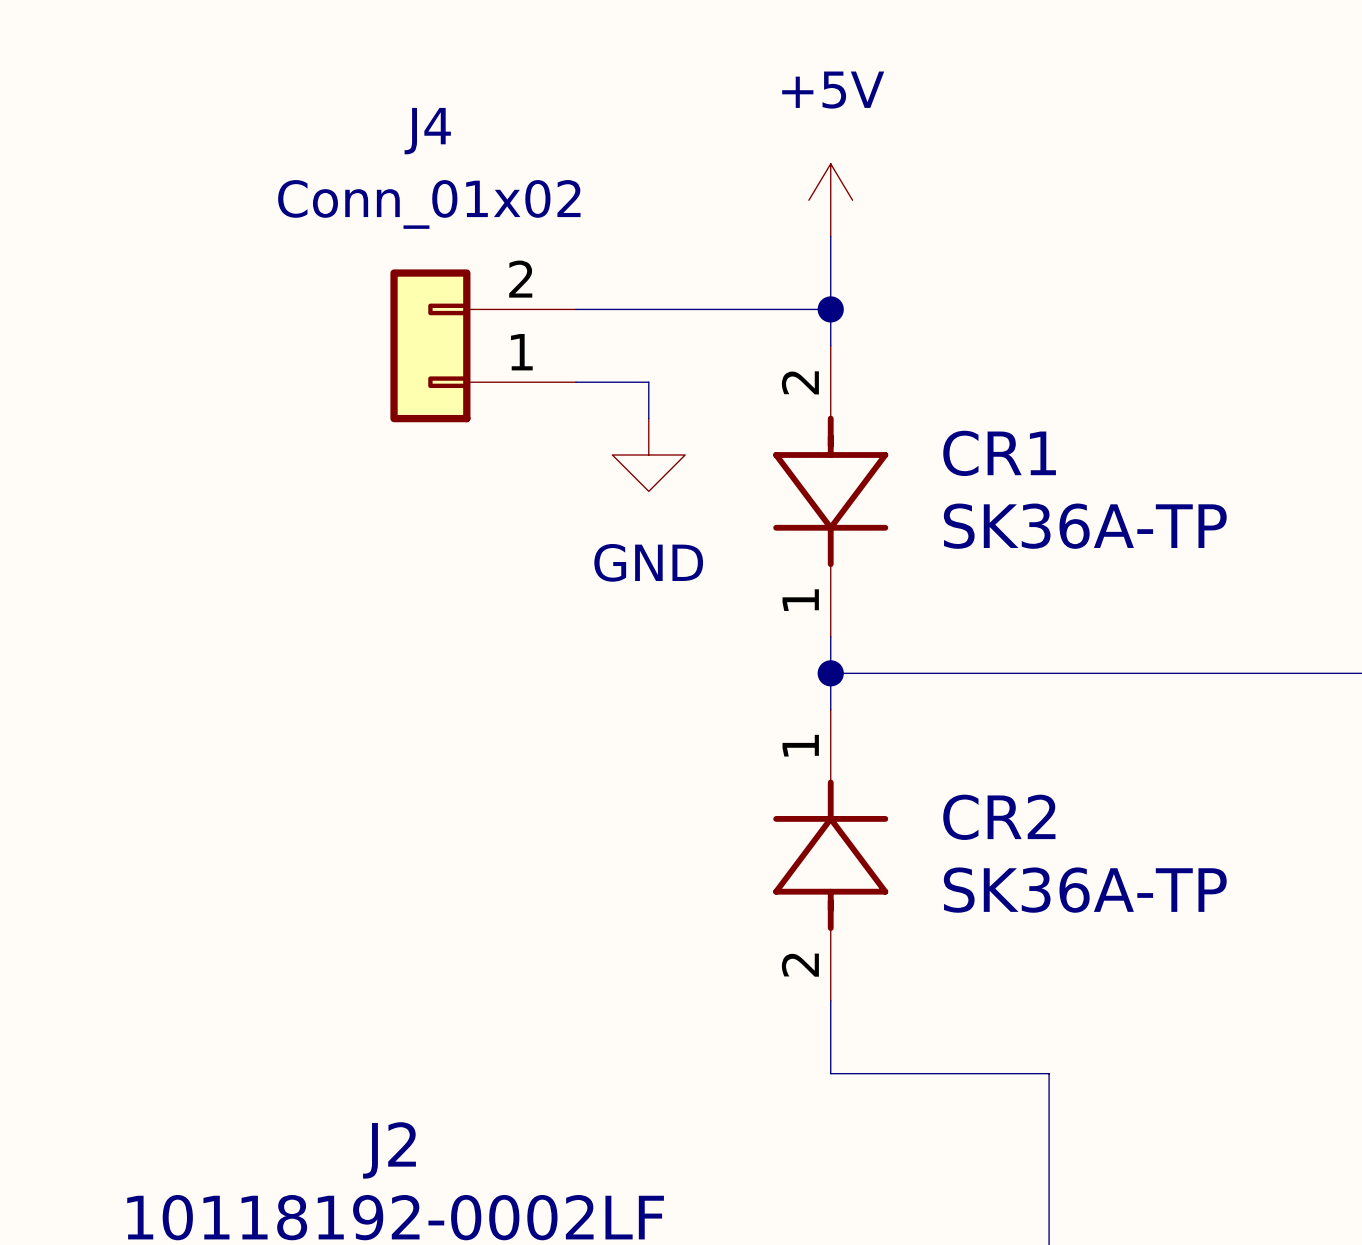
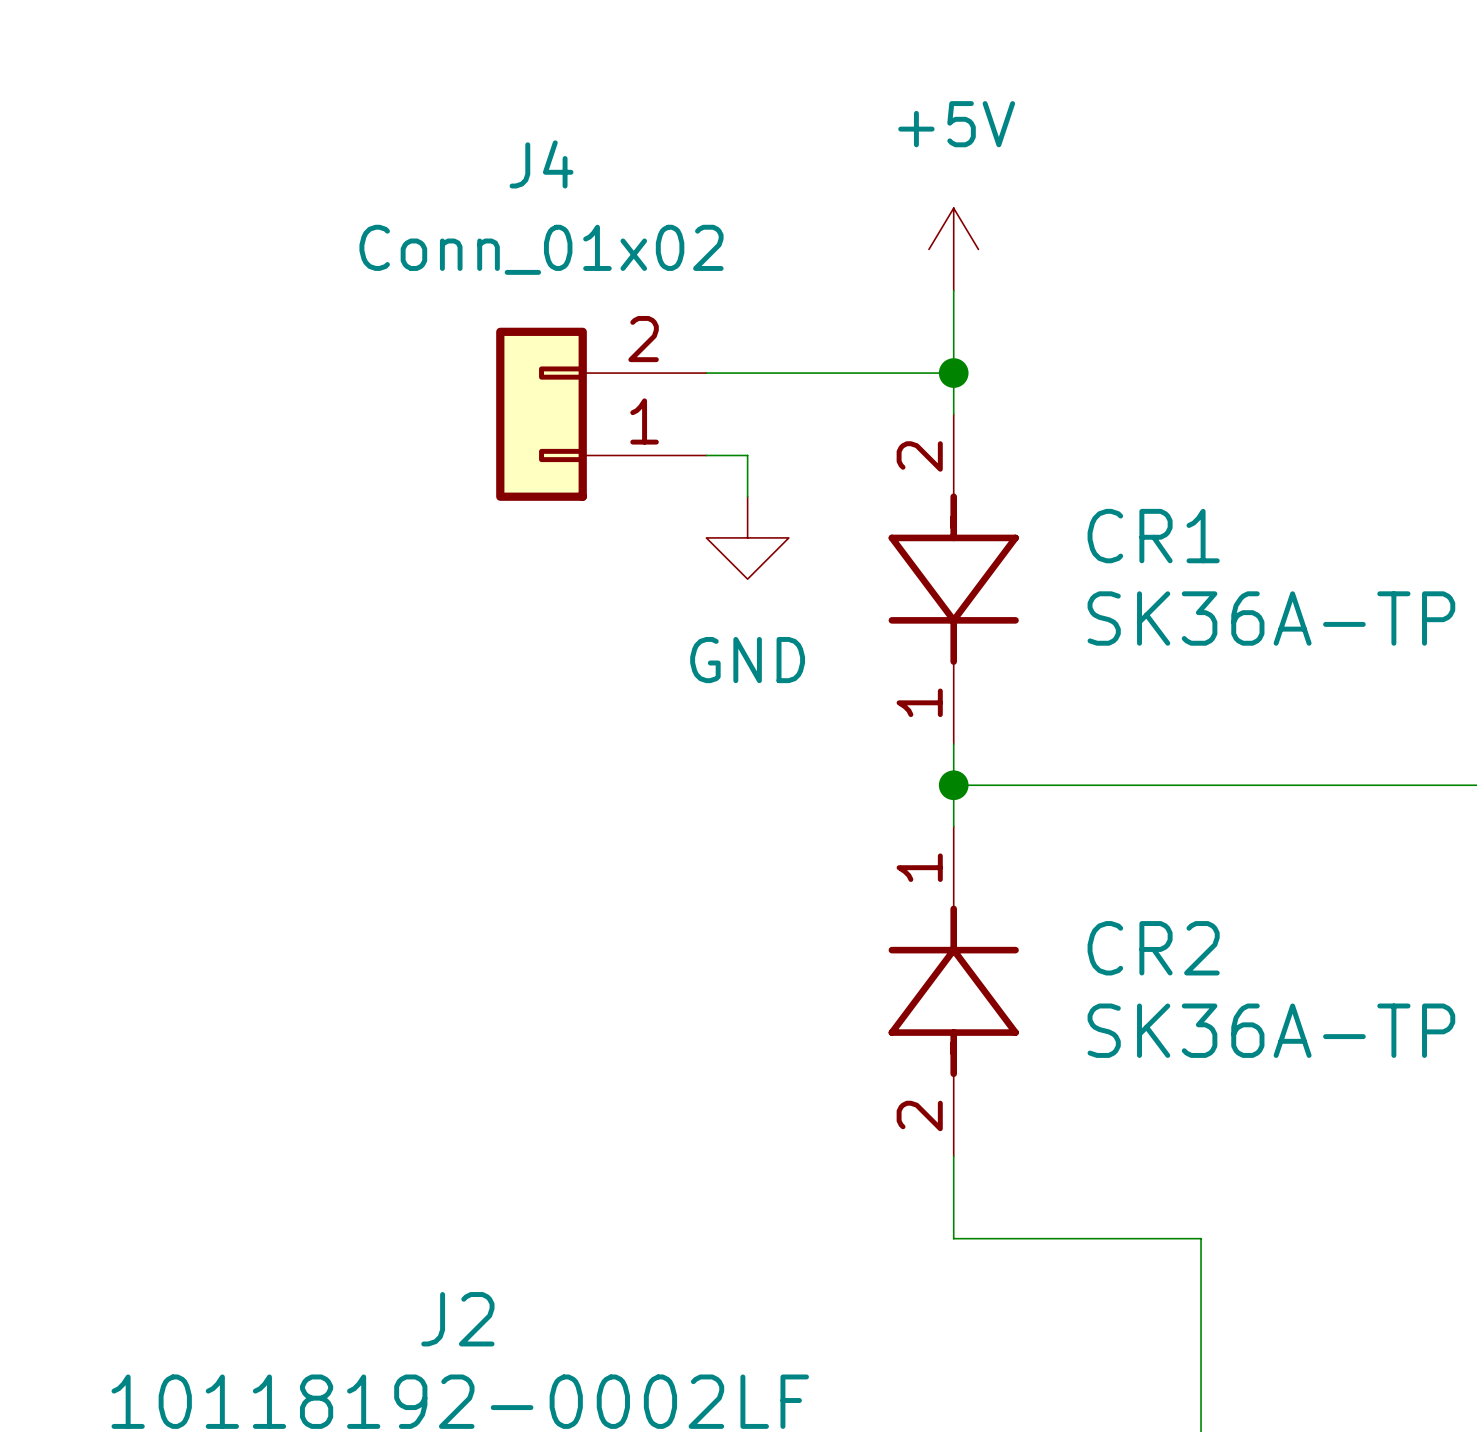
J4 position: (483, 345) -> (601, 414)

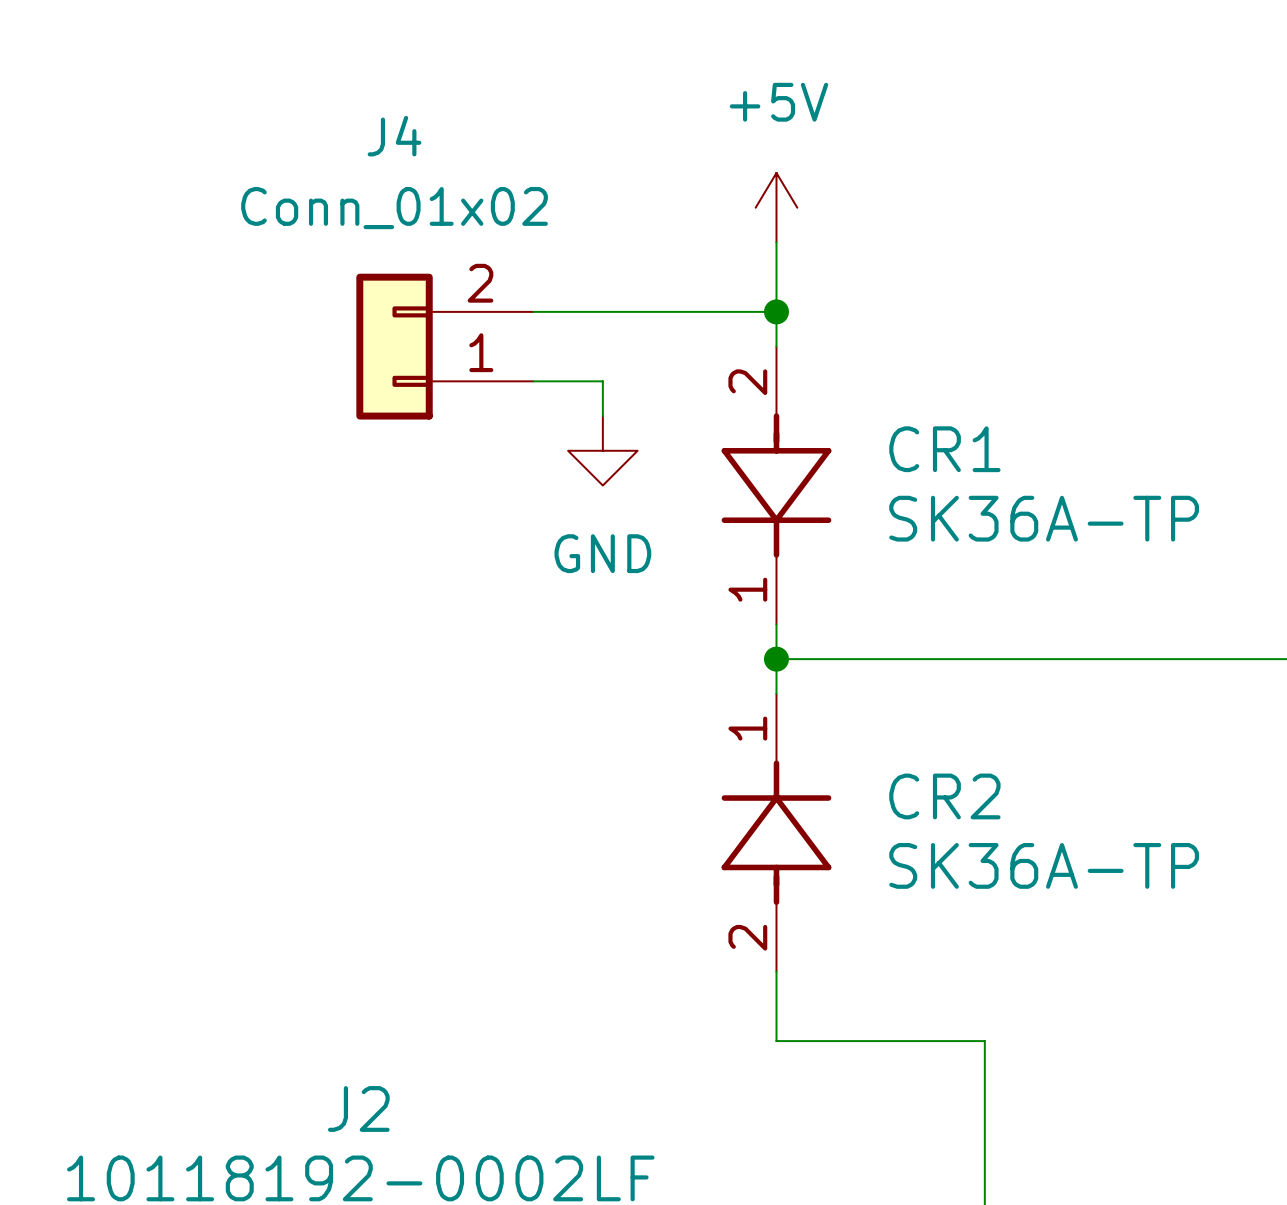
J4 position: (601, 414) -> (444, 346)

